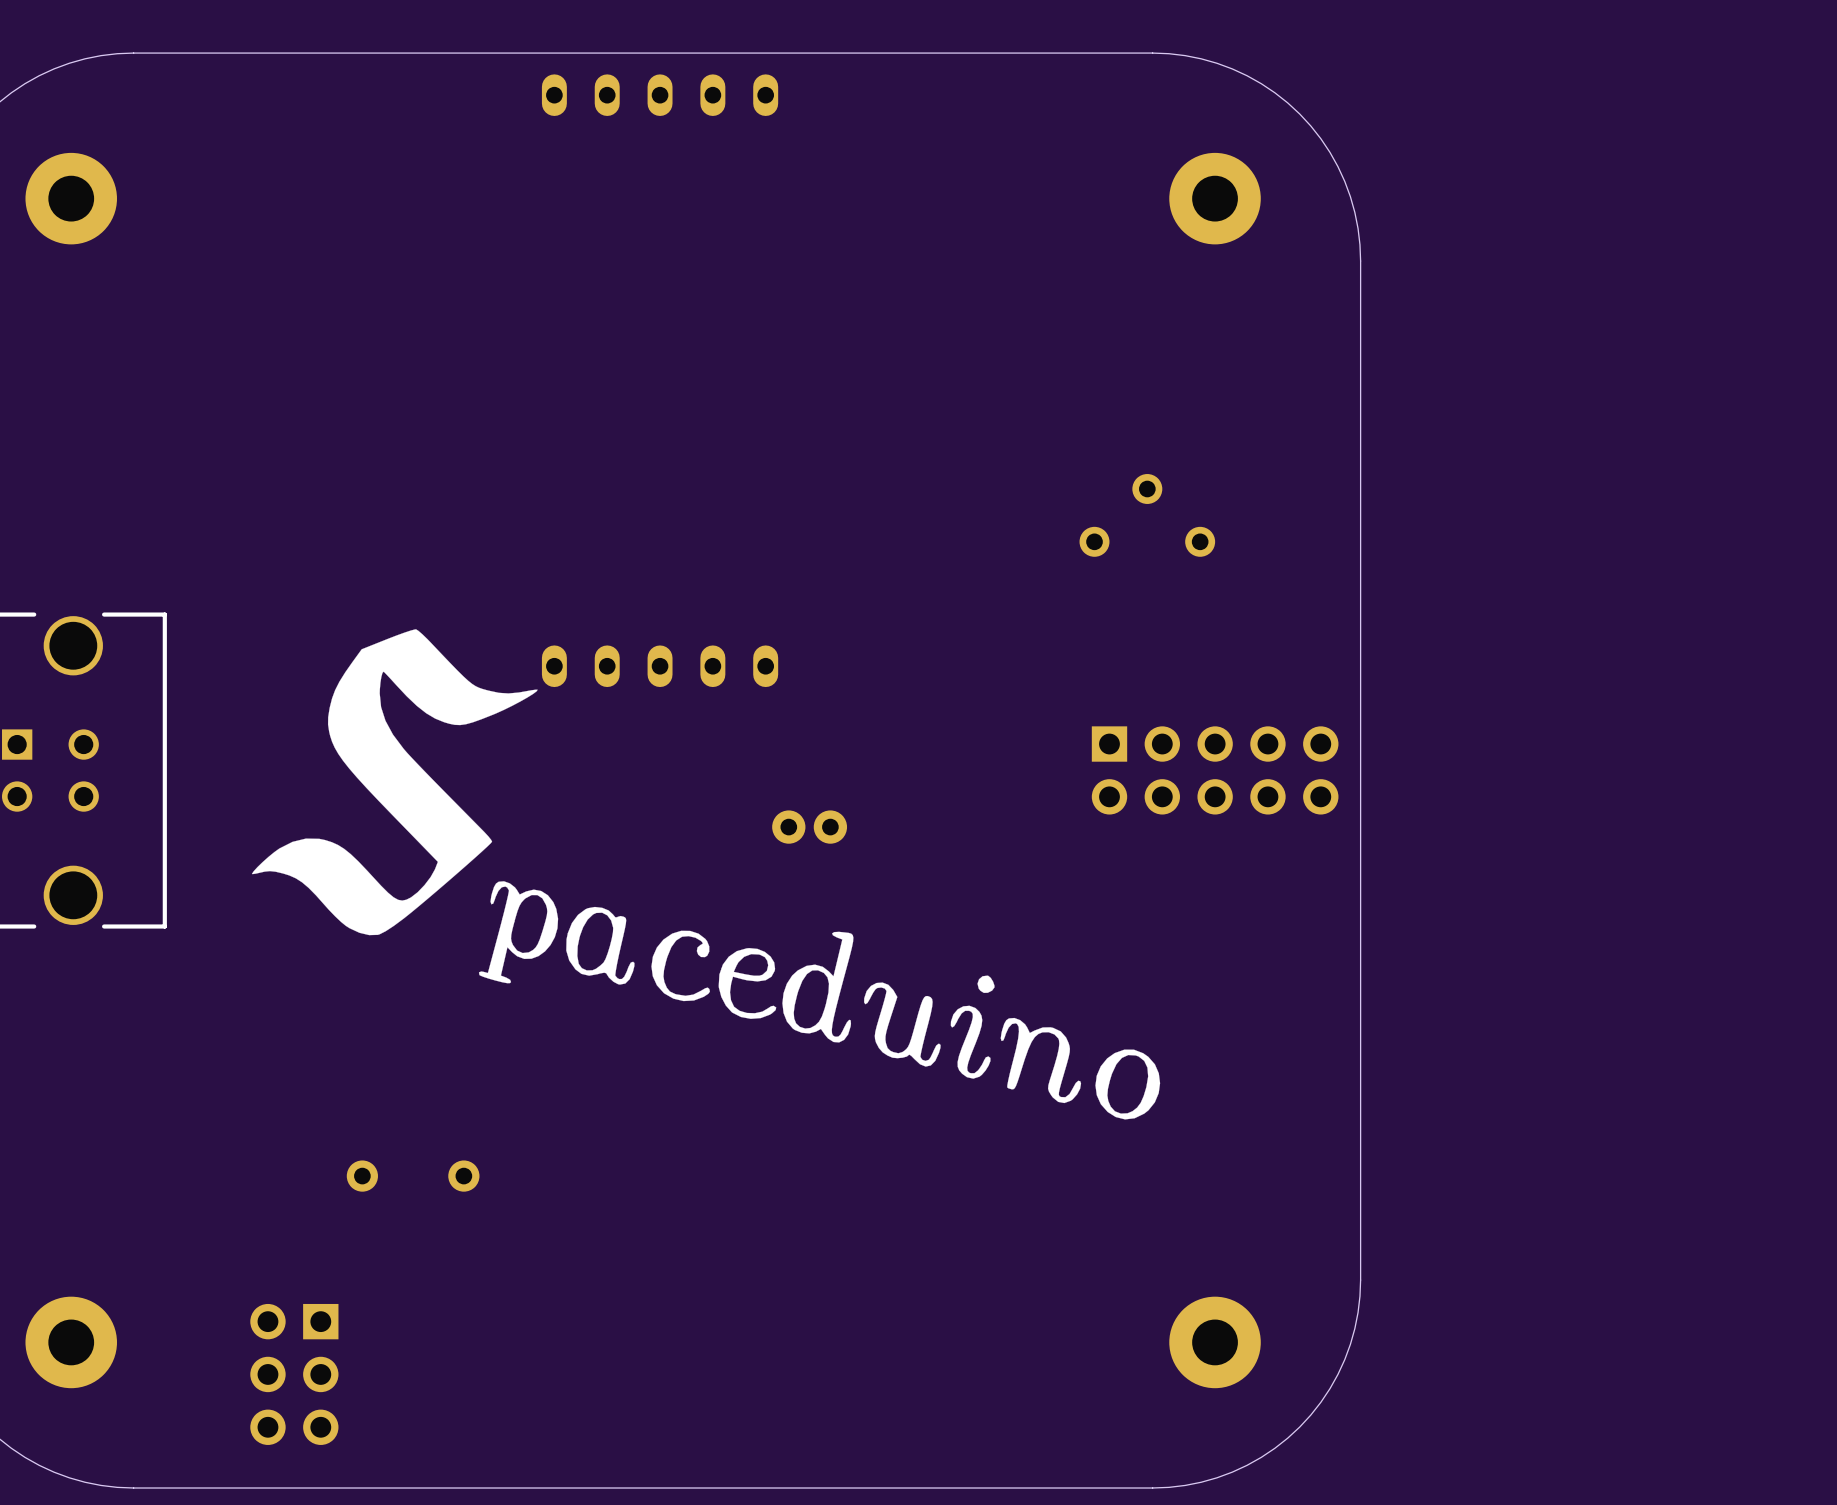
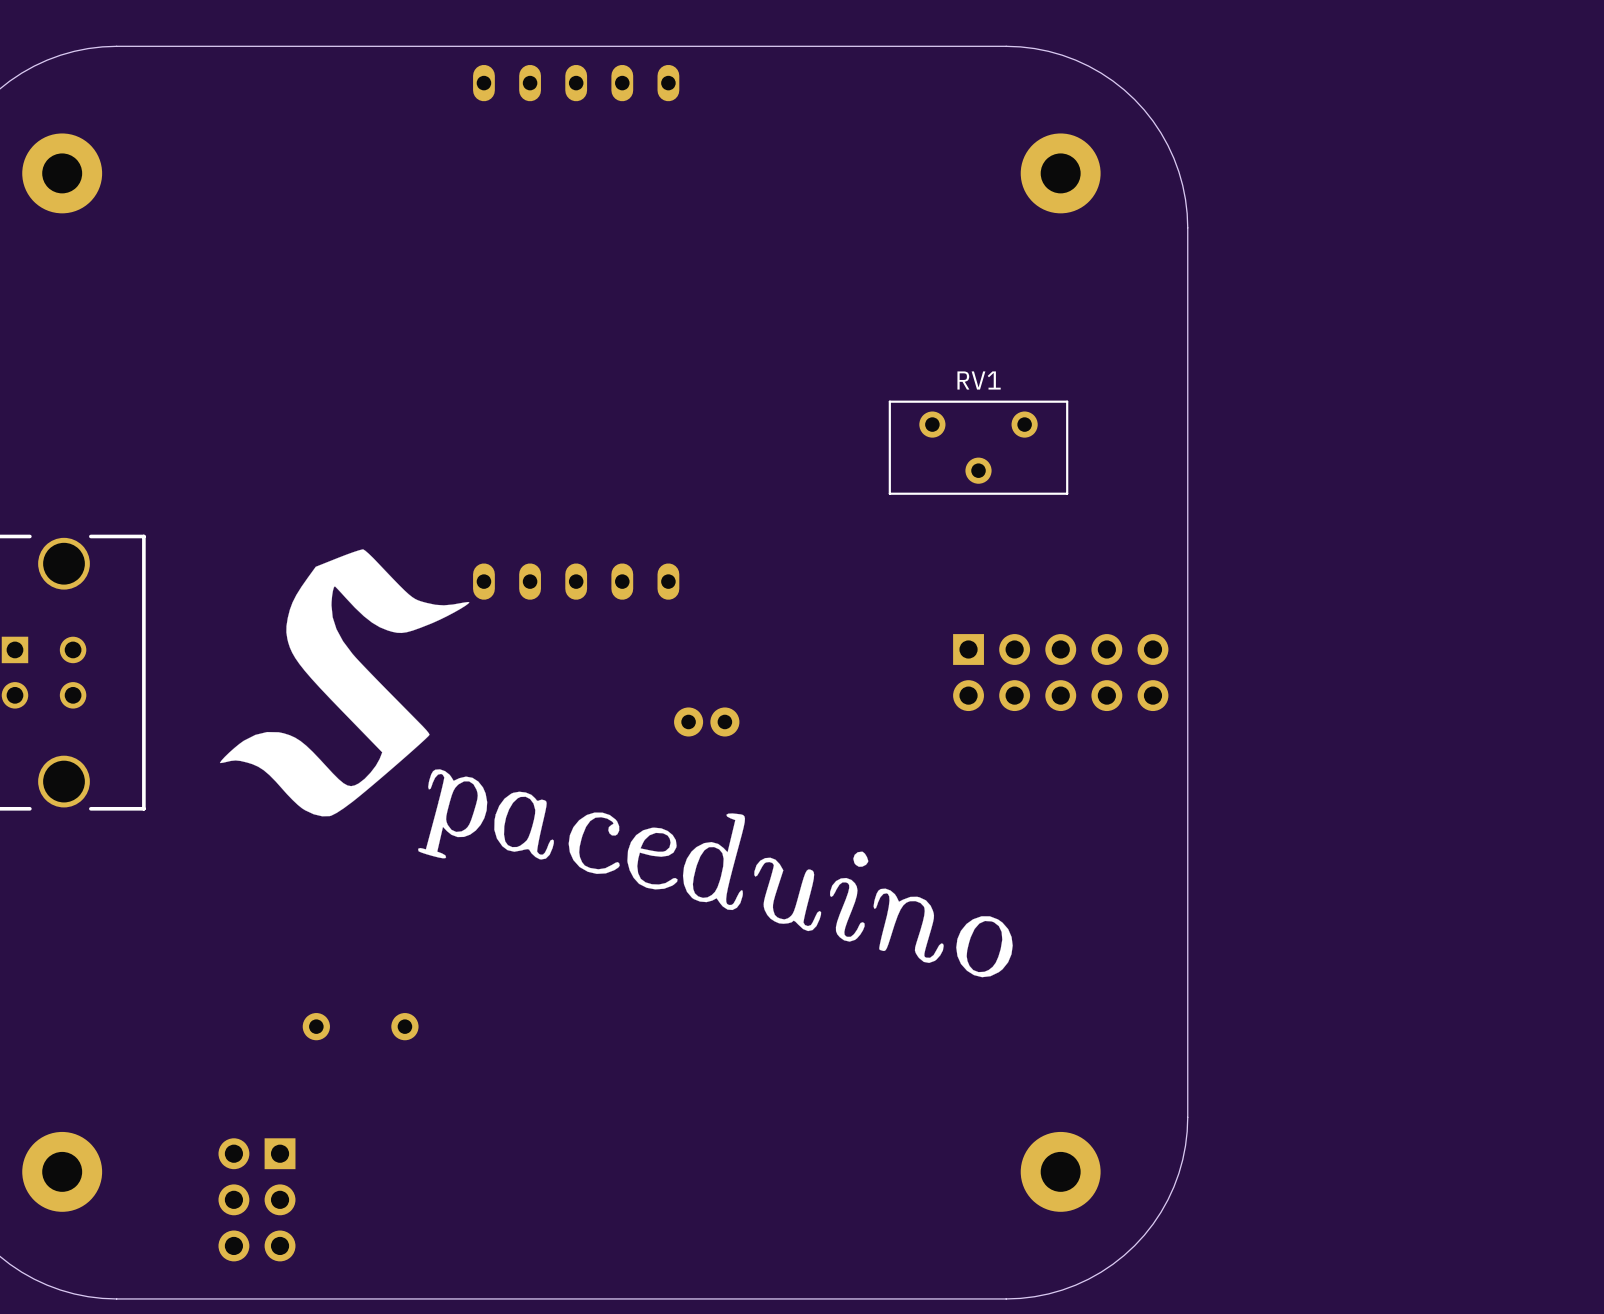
RV1 side: bottom (1147, 515) -> top (978, 447)

